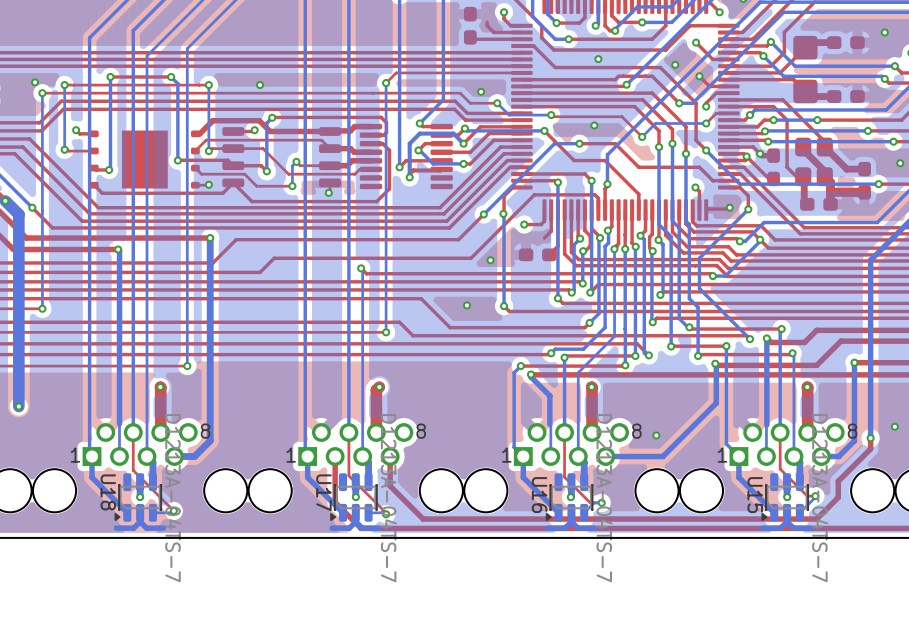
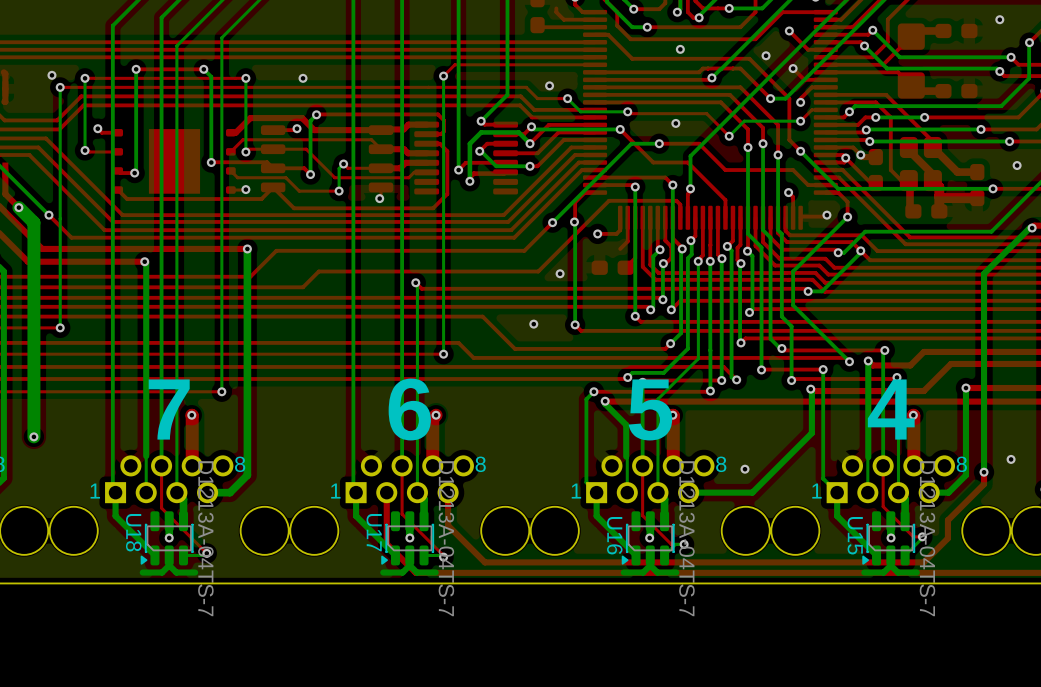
text: none -> 4 (891, 409)
text: none -> 7 (169, 409)
text: none -> 6 (409, 409)
text: none -> 5 (650, 409)

